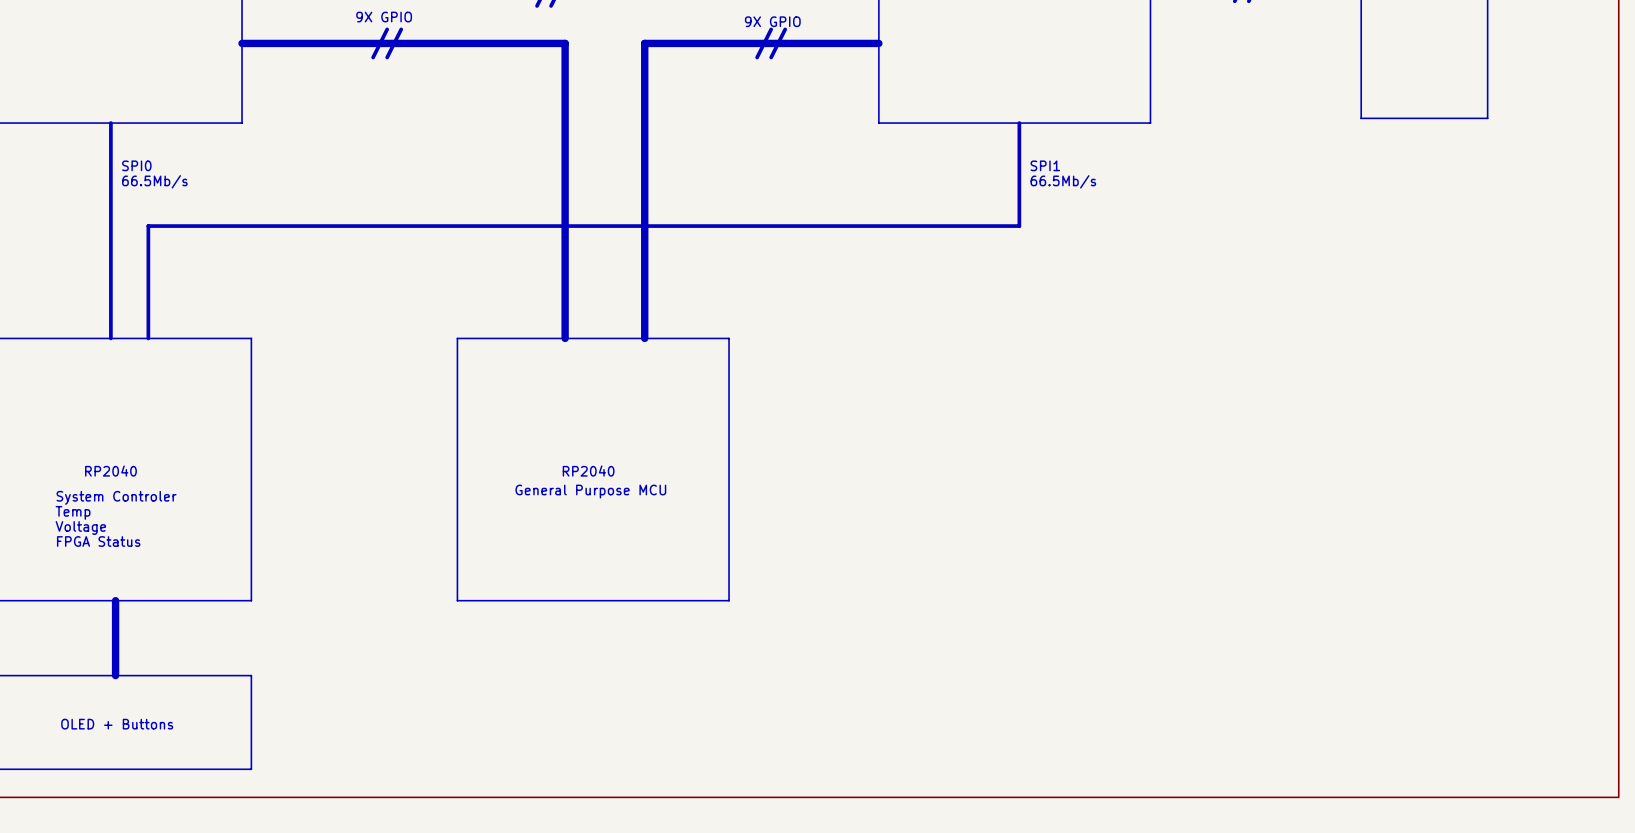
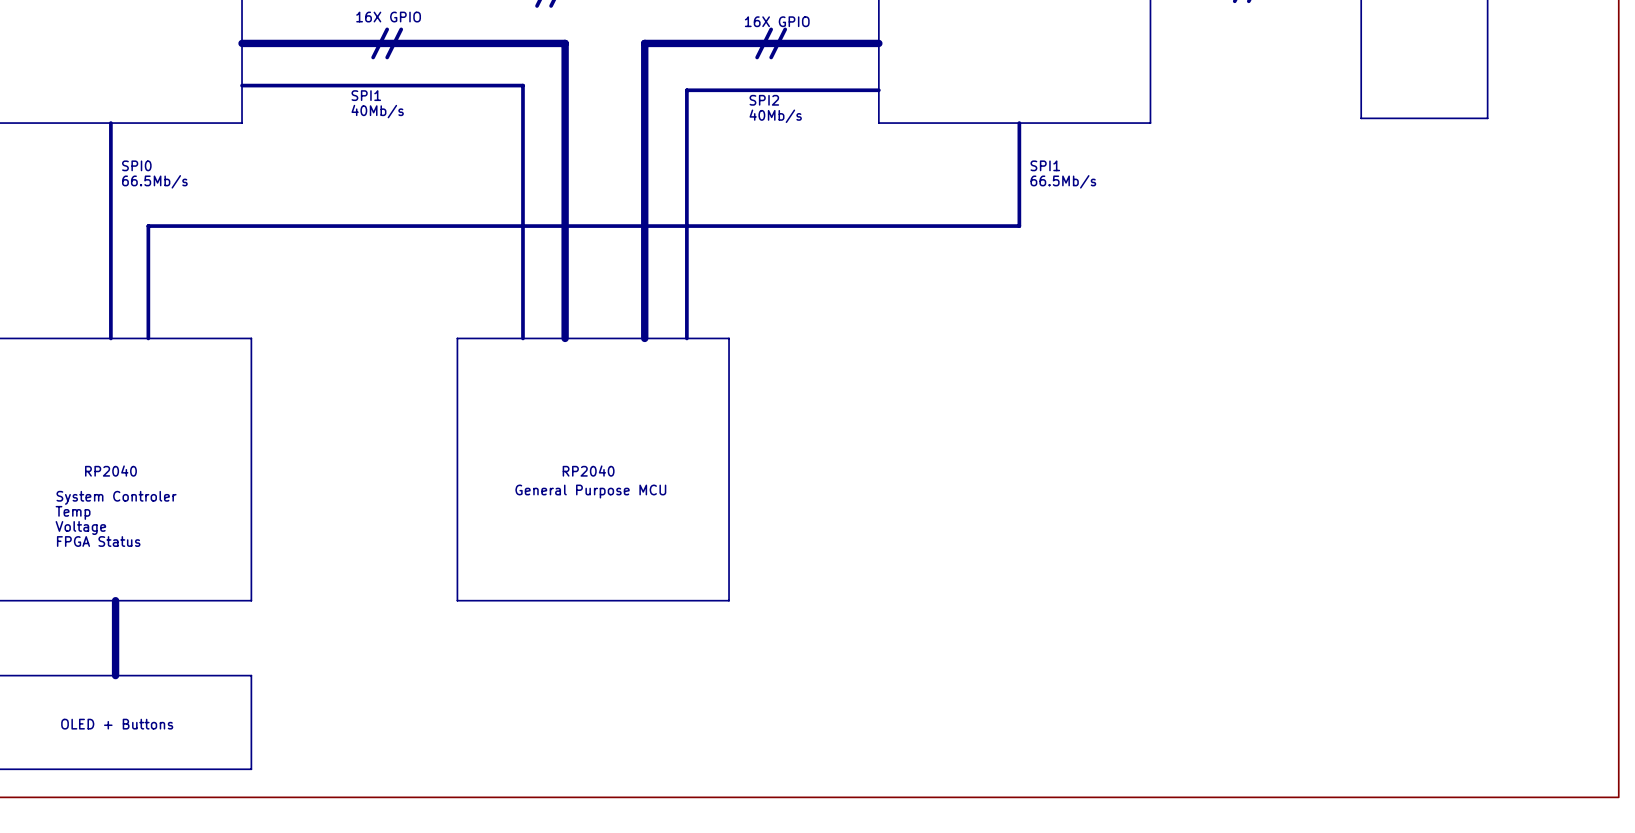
text: 9X GPIO (384, 17) -> 16X GPIO (388, 17)
text: 9X GPIO (772, 21) -> 16X GPIO (777, 21)
line: none -> (242, 85) (522, 85) (522, 338)
line: none -> (878, 90) (686, 90) (686, 338)
text: none -> SPI1 (366, 95)
text: none -> SPI2 (764, 100)
text: none -> 40Mb/s (377, 111)
text: none -> 40Mb/s (775, 116)

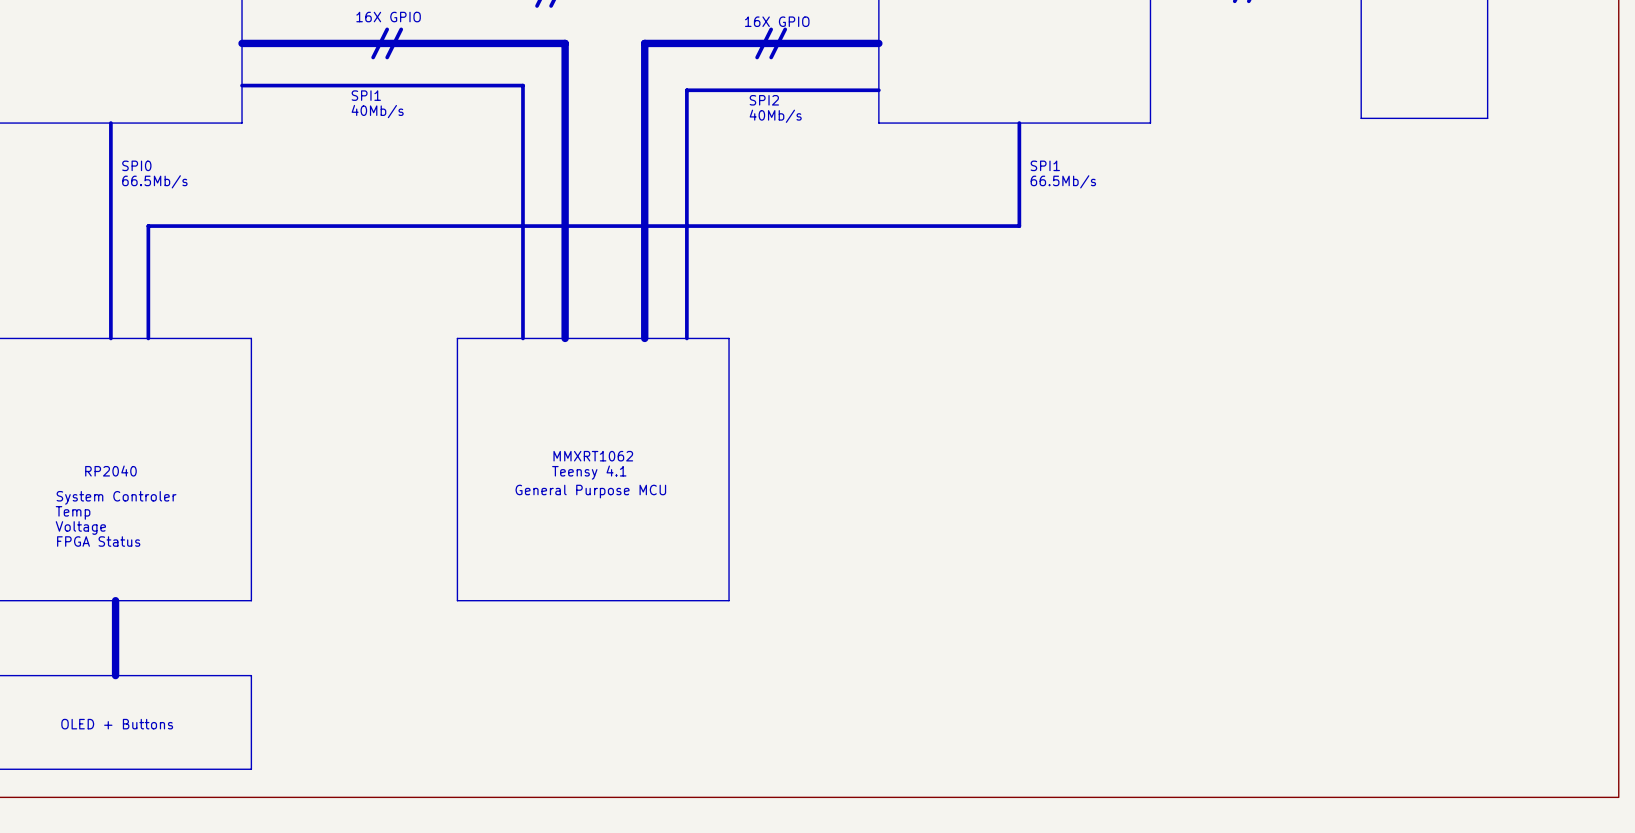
text: none -> MMXRT1062 (593, 456)
text: RP2040 (588, 471) -> none
text: none -> Teensy 4.1 (589, 472)

